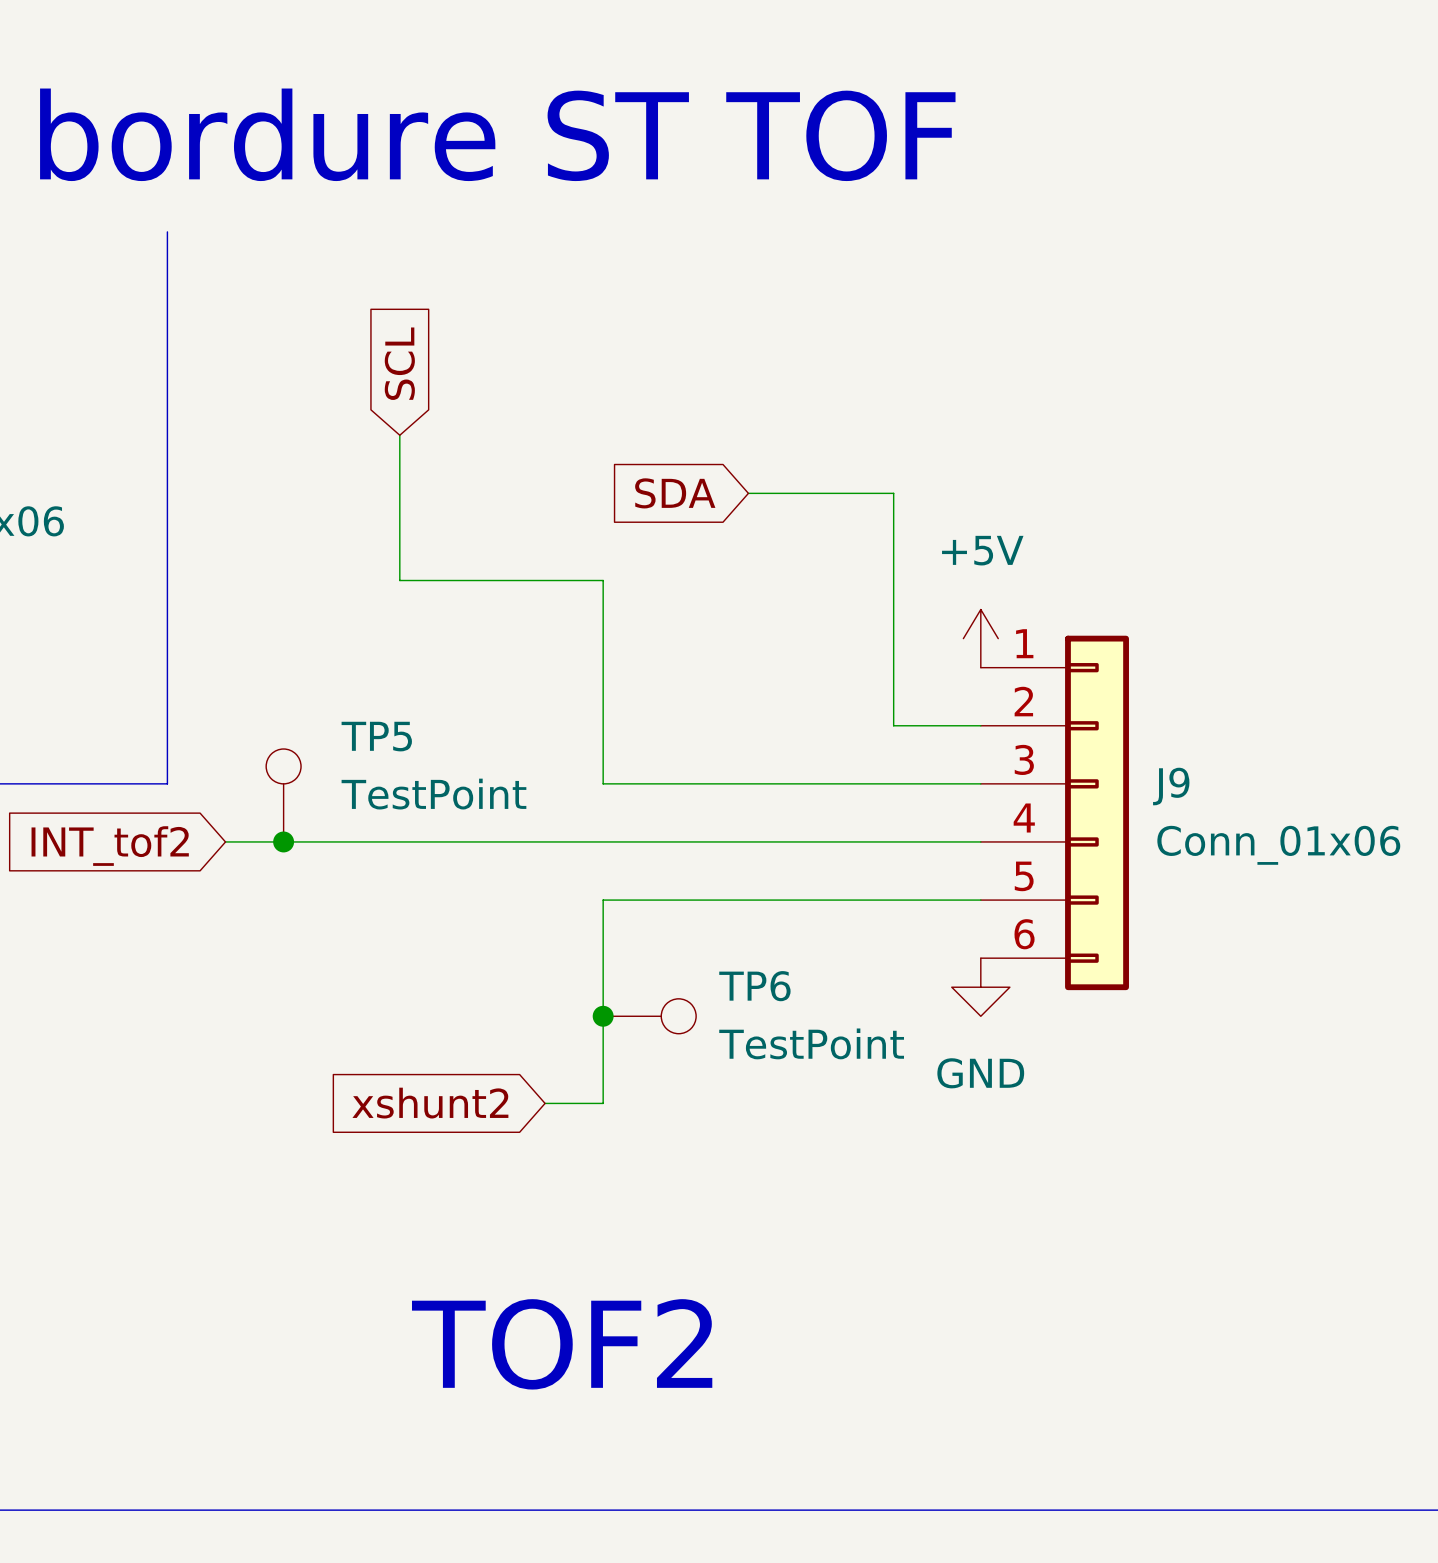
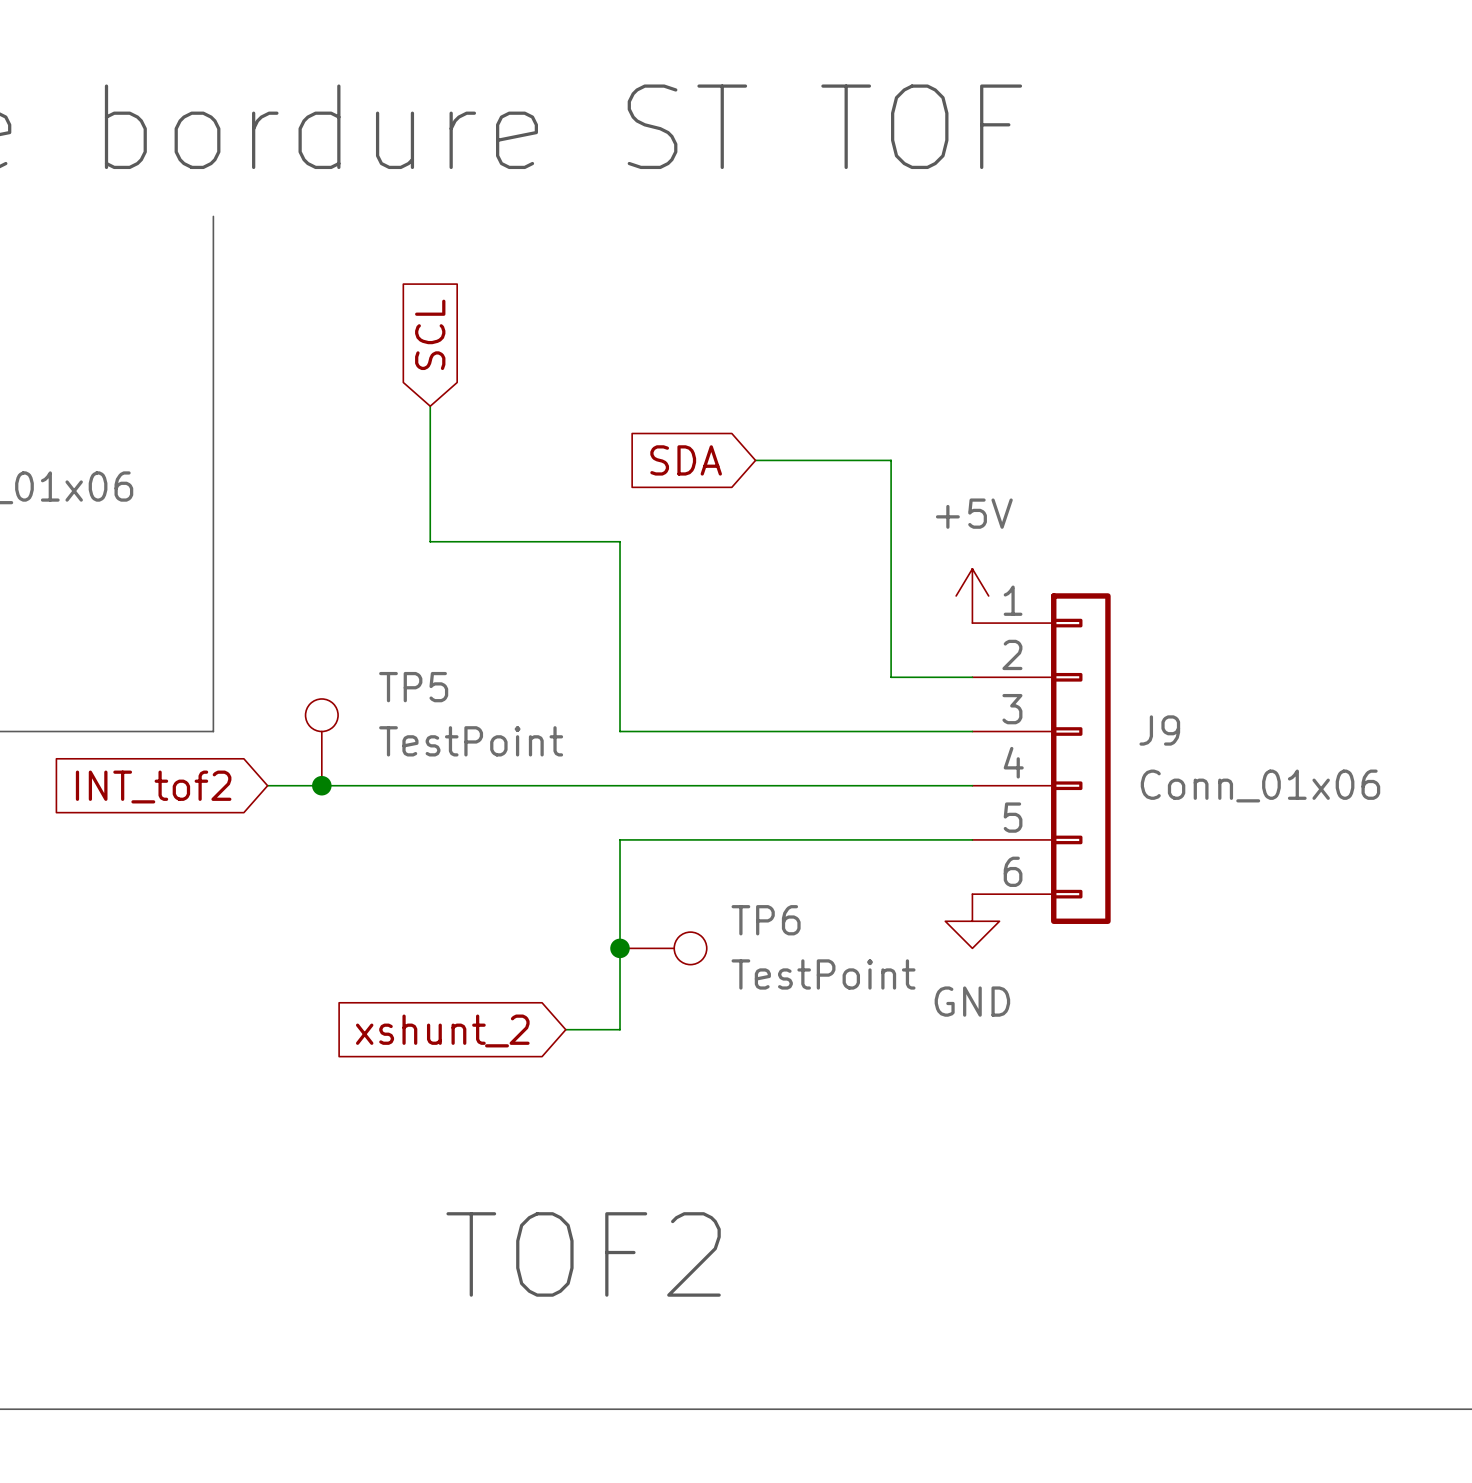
global label: xshunt2 (430, 1103) -> xshunt_2 (442, 1030)

